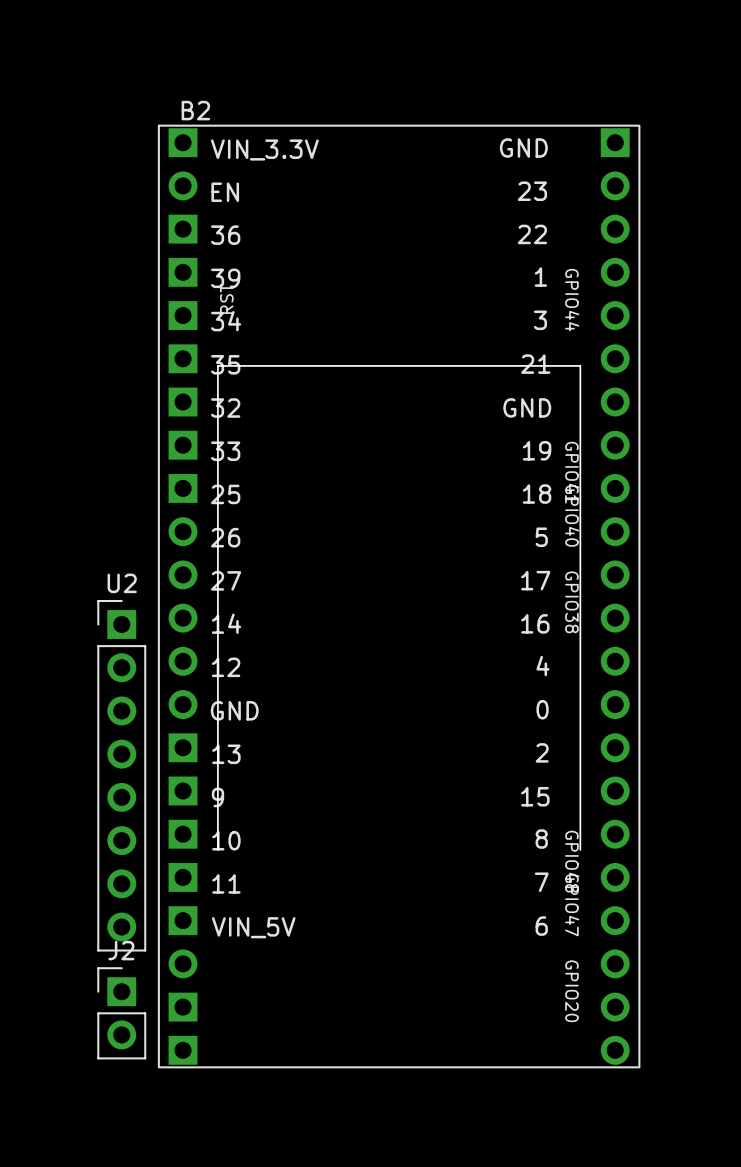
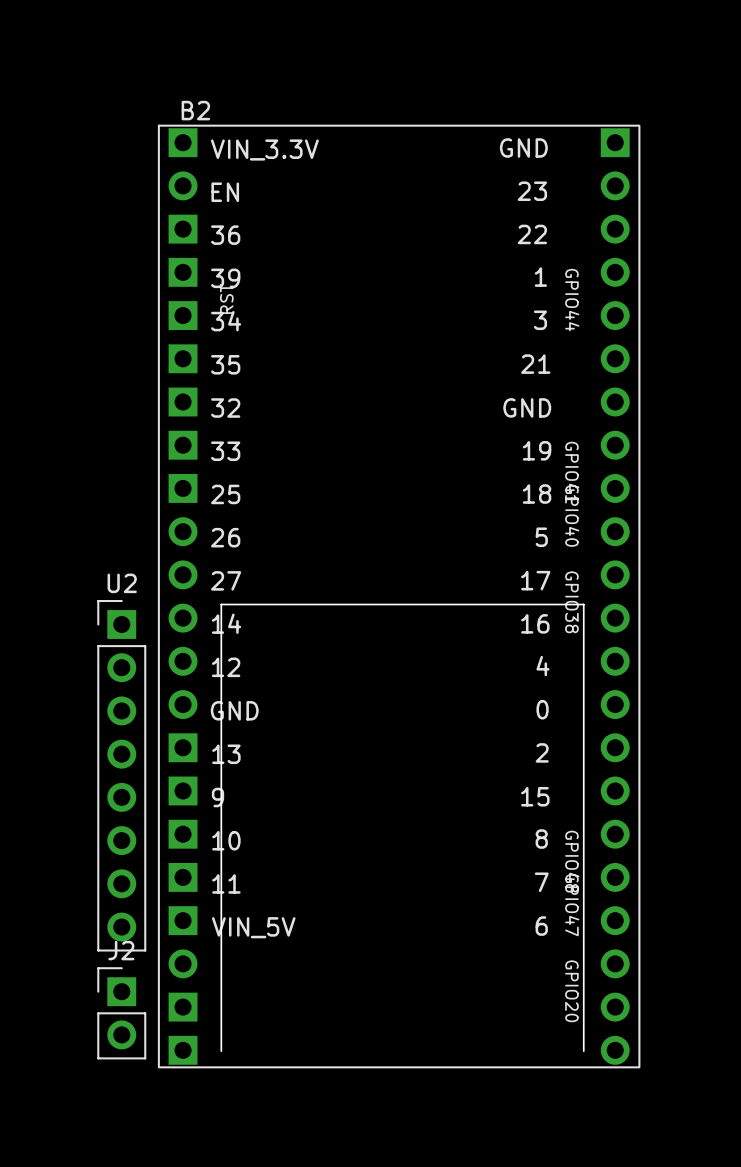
part: (399, 607) -> none
part: none -> (402, 827)

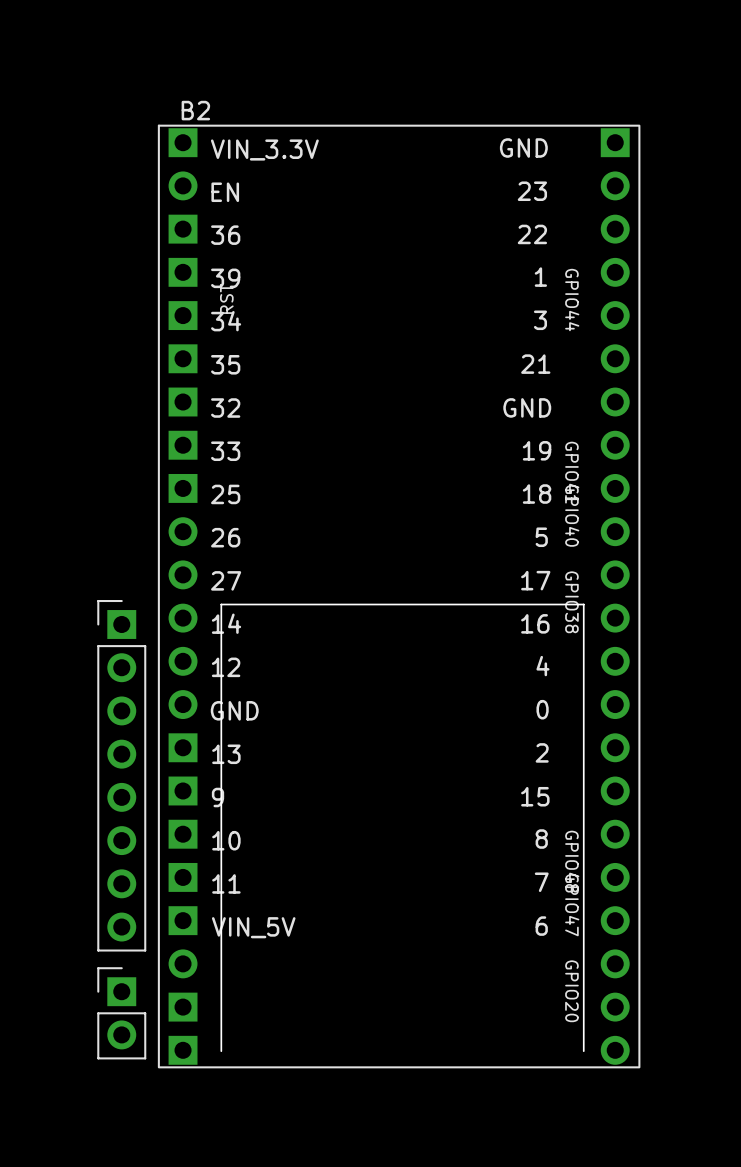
U2 name: U2 (122, 583) -> none
J2 name: J2 (121, 950) -> none

